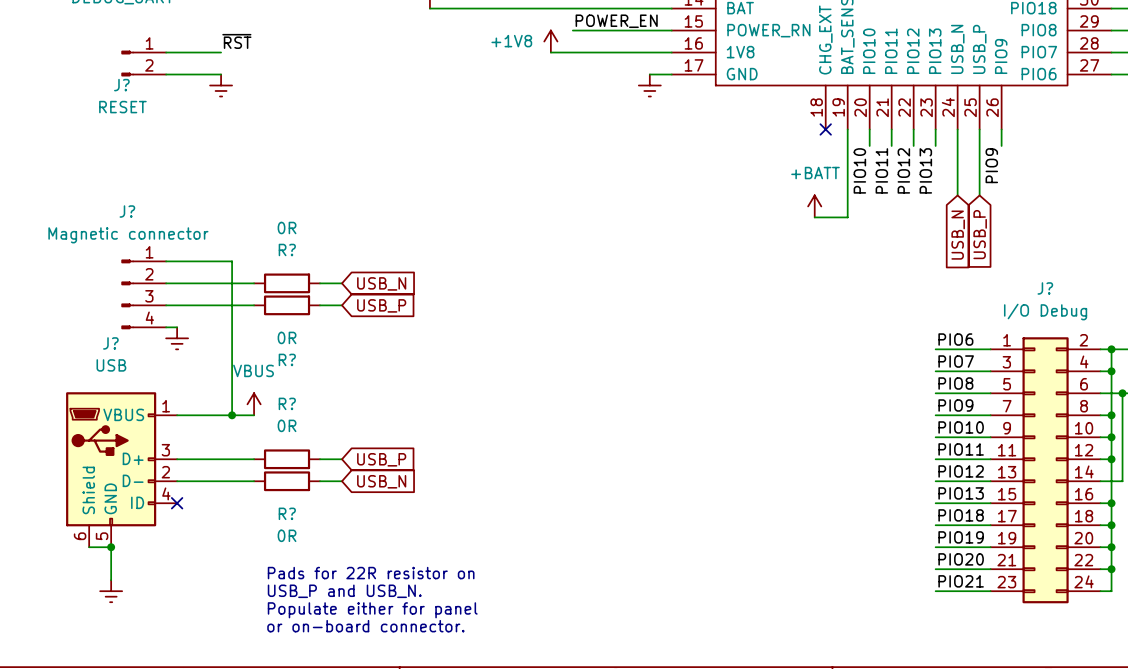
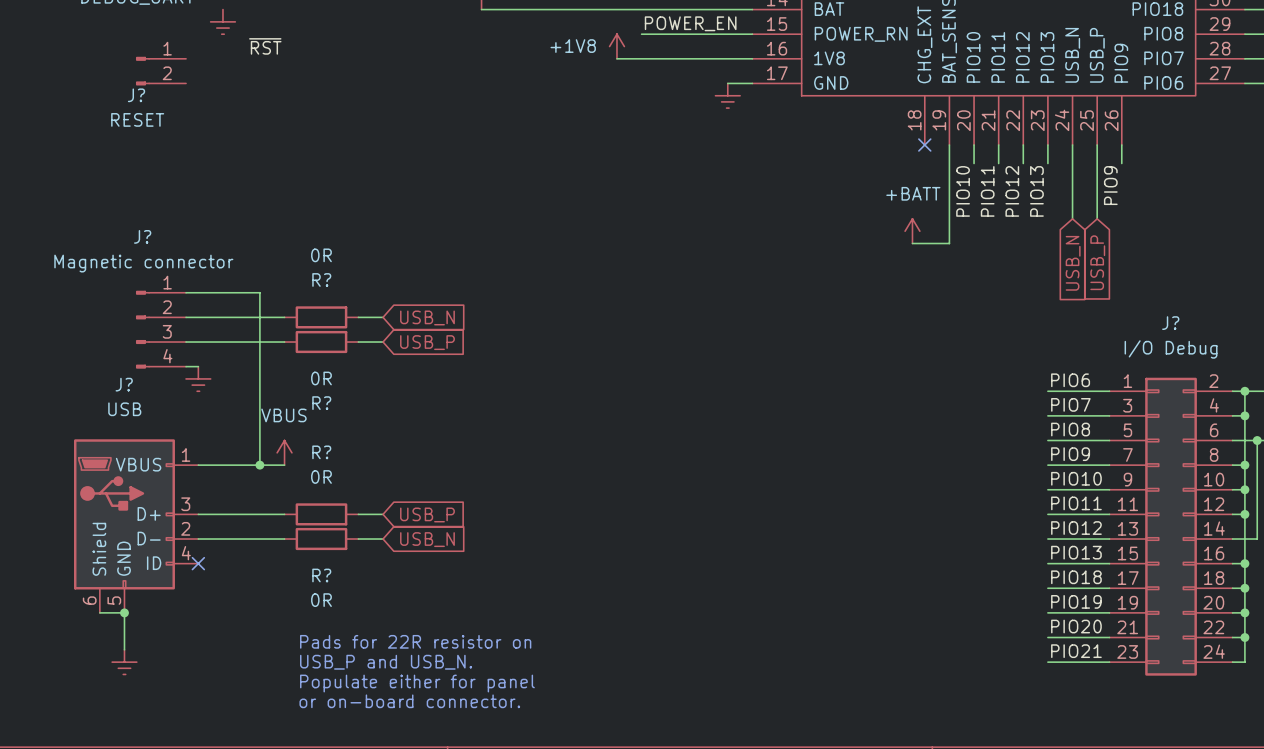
power symbol: none -> (222, 21)
wire: (166, 52) (221, 52) -> none
wire: (166, 74) (221, 74) -> none
power symbol: (221, 85) -> none

